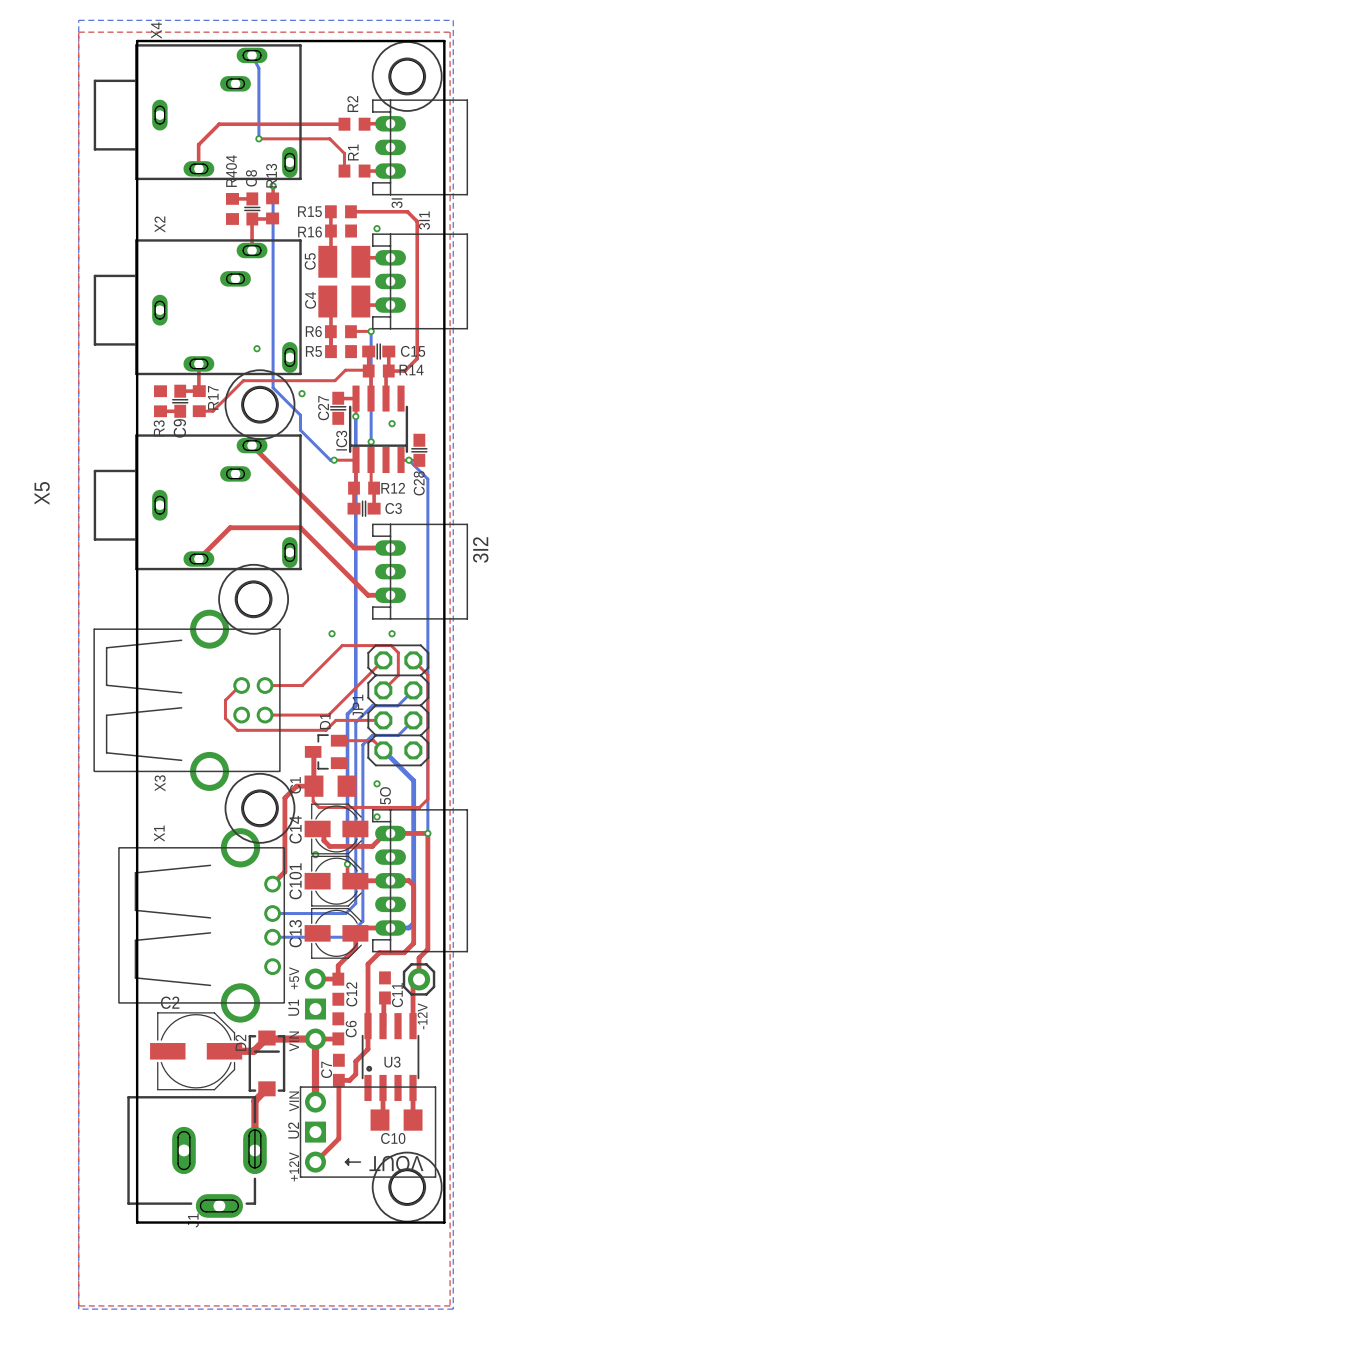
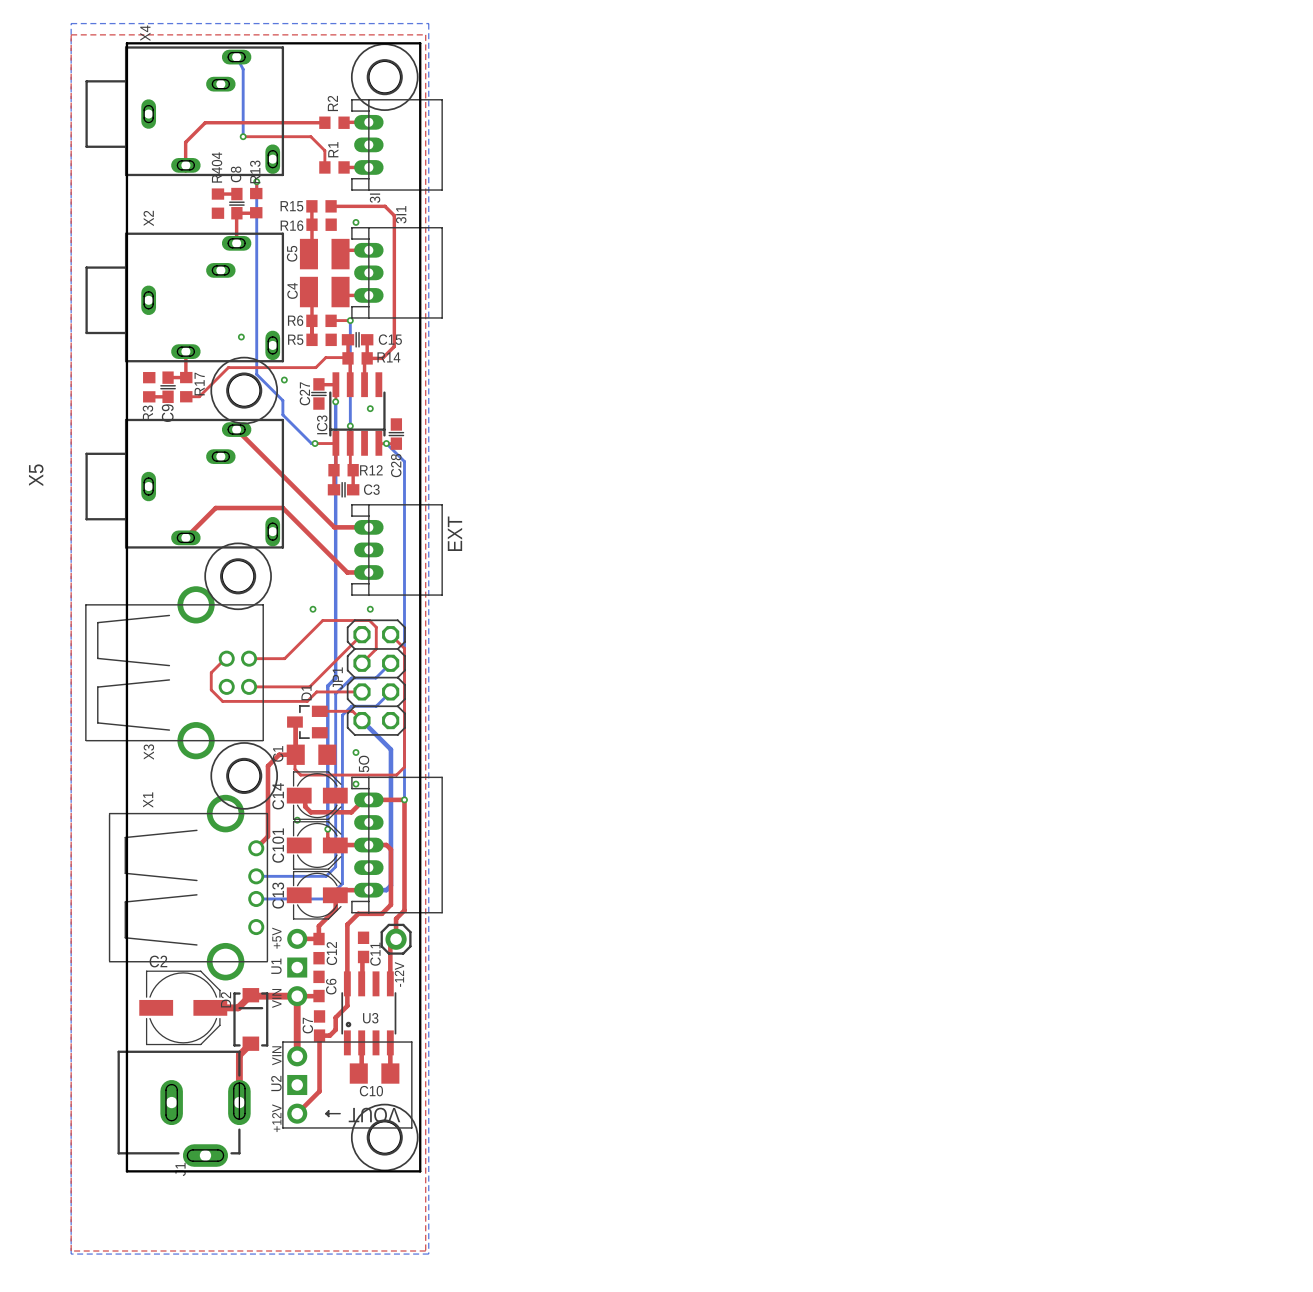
3I2 name: 3I2 (480, 549) -> EXT (454, 533)

